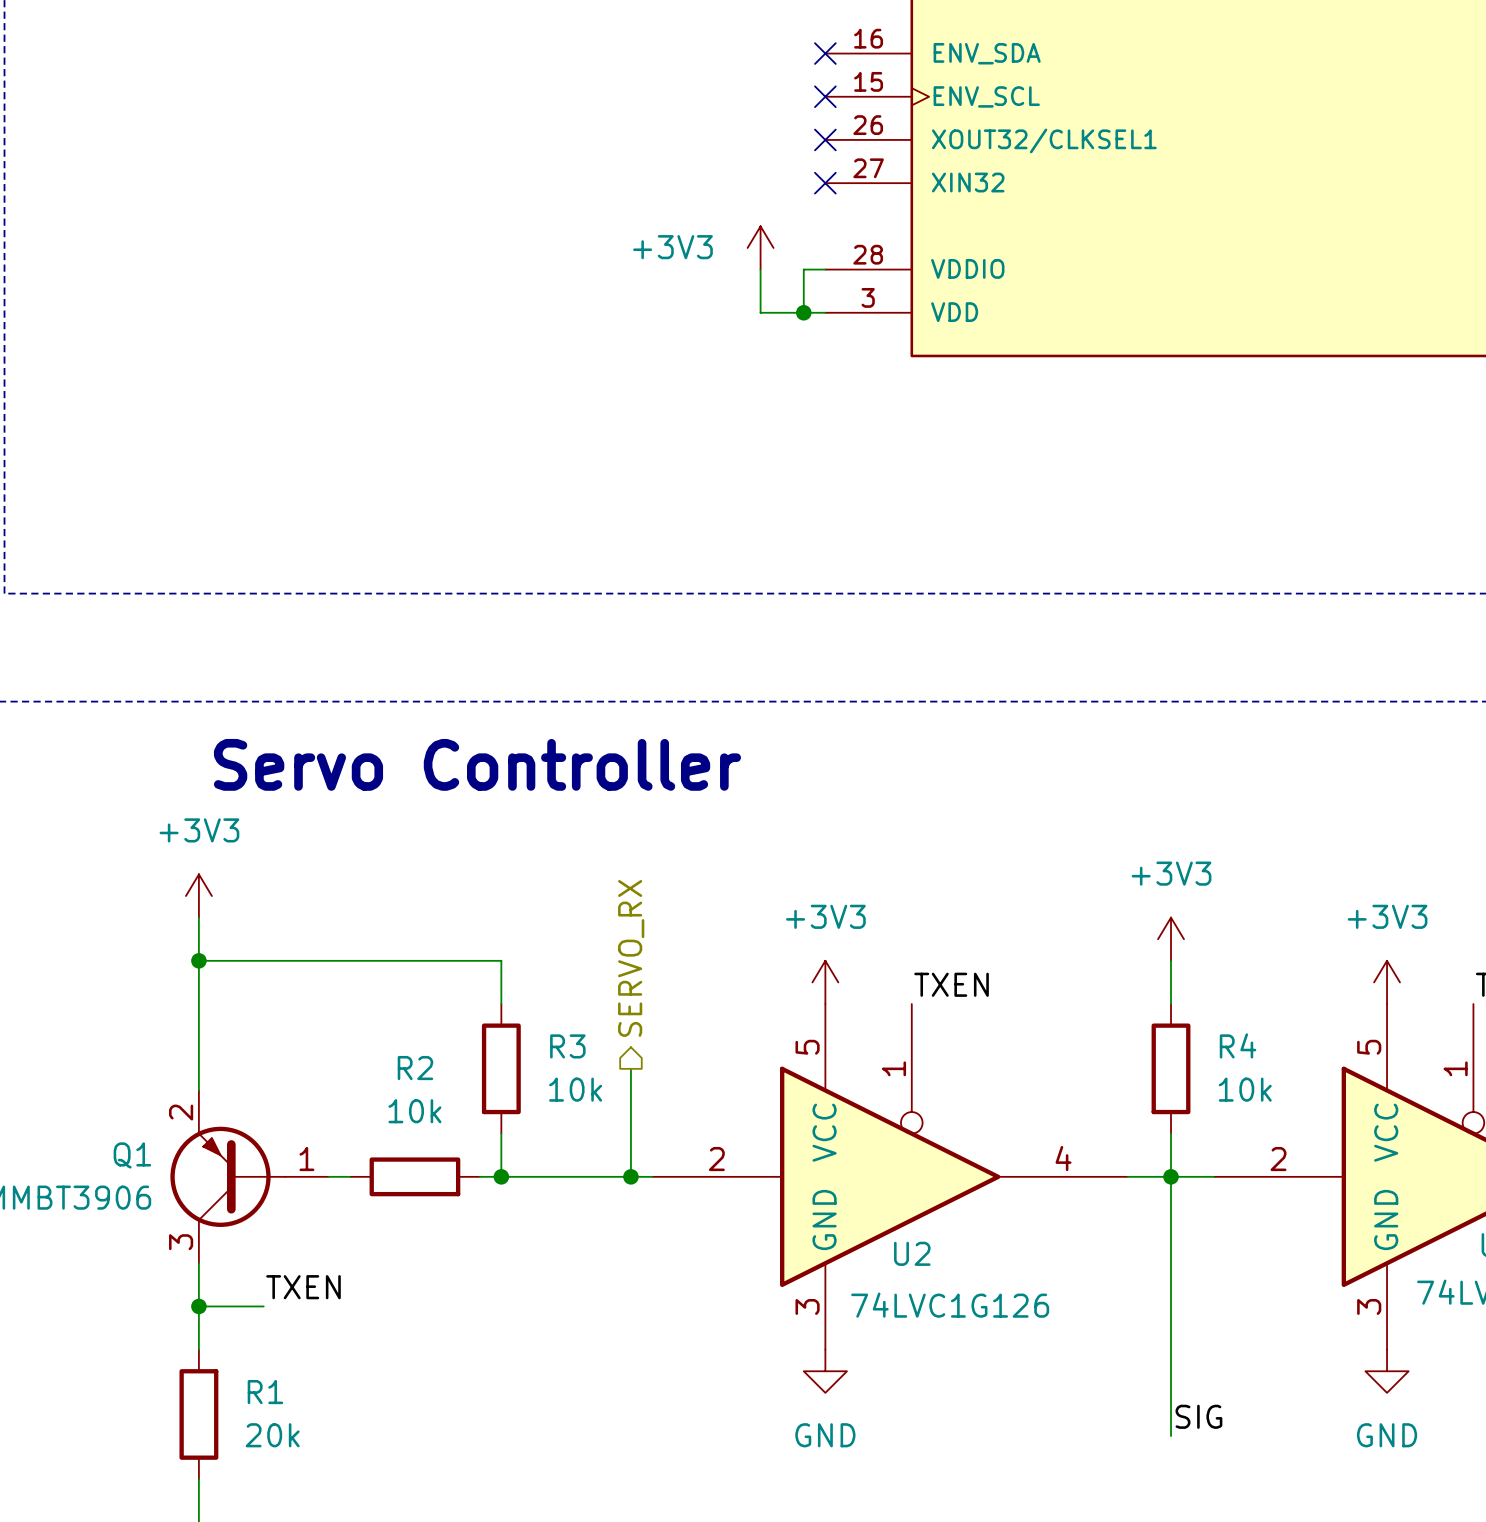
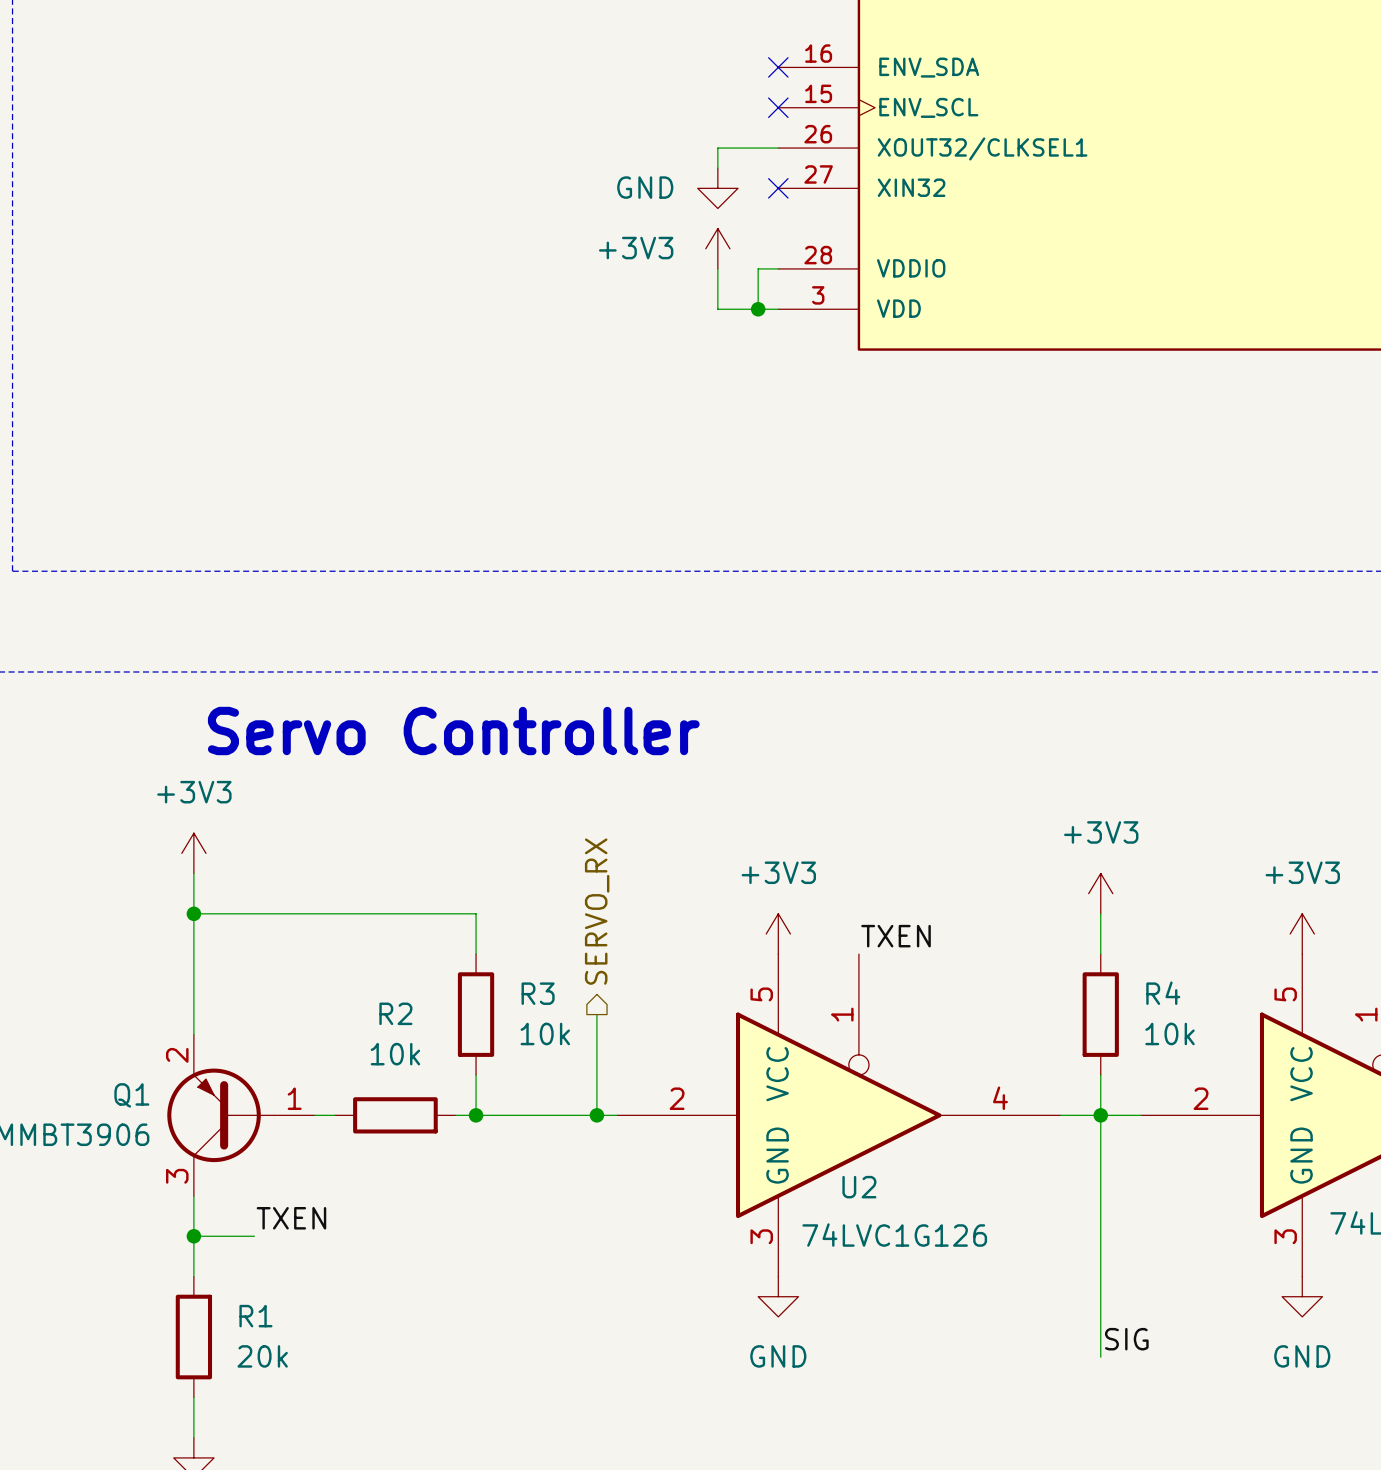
wire: none -> (778, 148) (717, 148) (717, 168)
no-connect mark: (825, 139) -> none
power symbol: none -> GND (717, 188)

